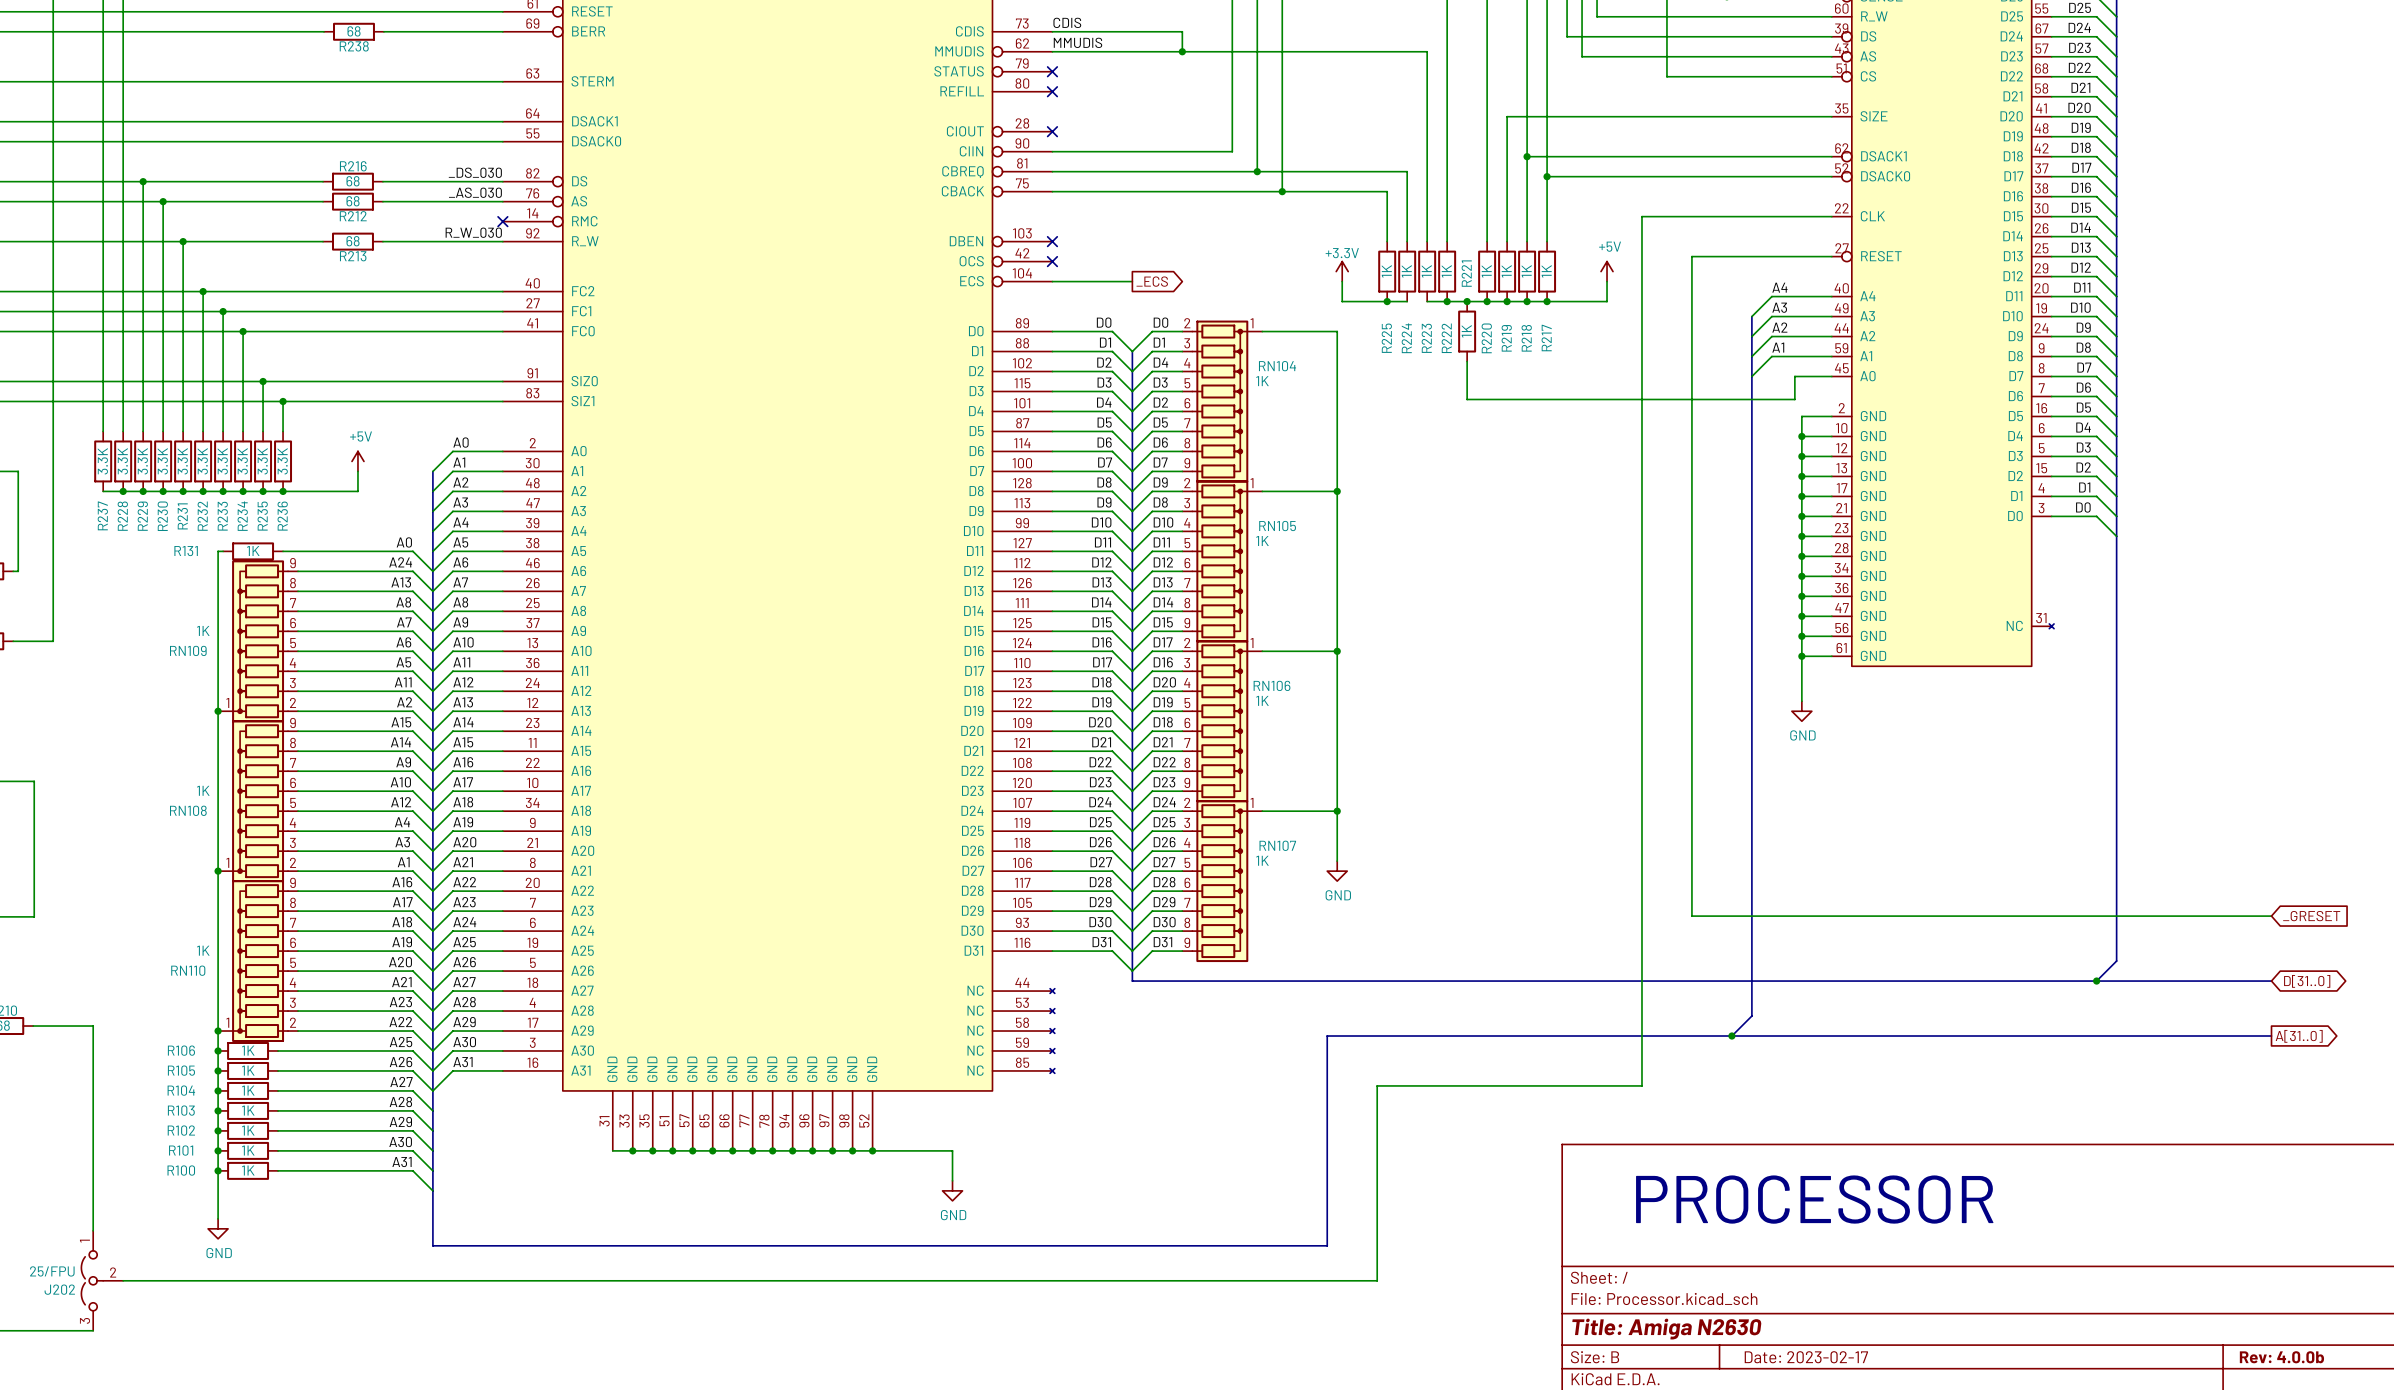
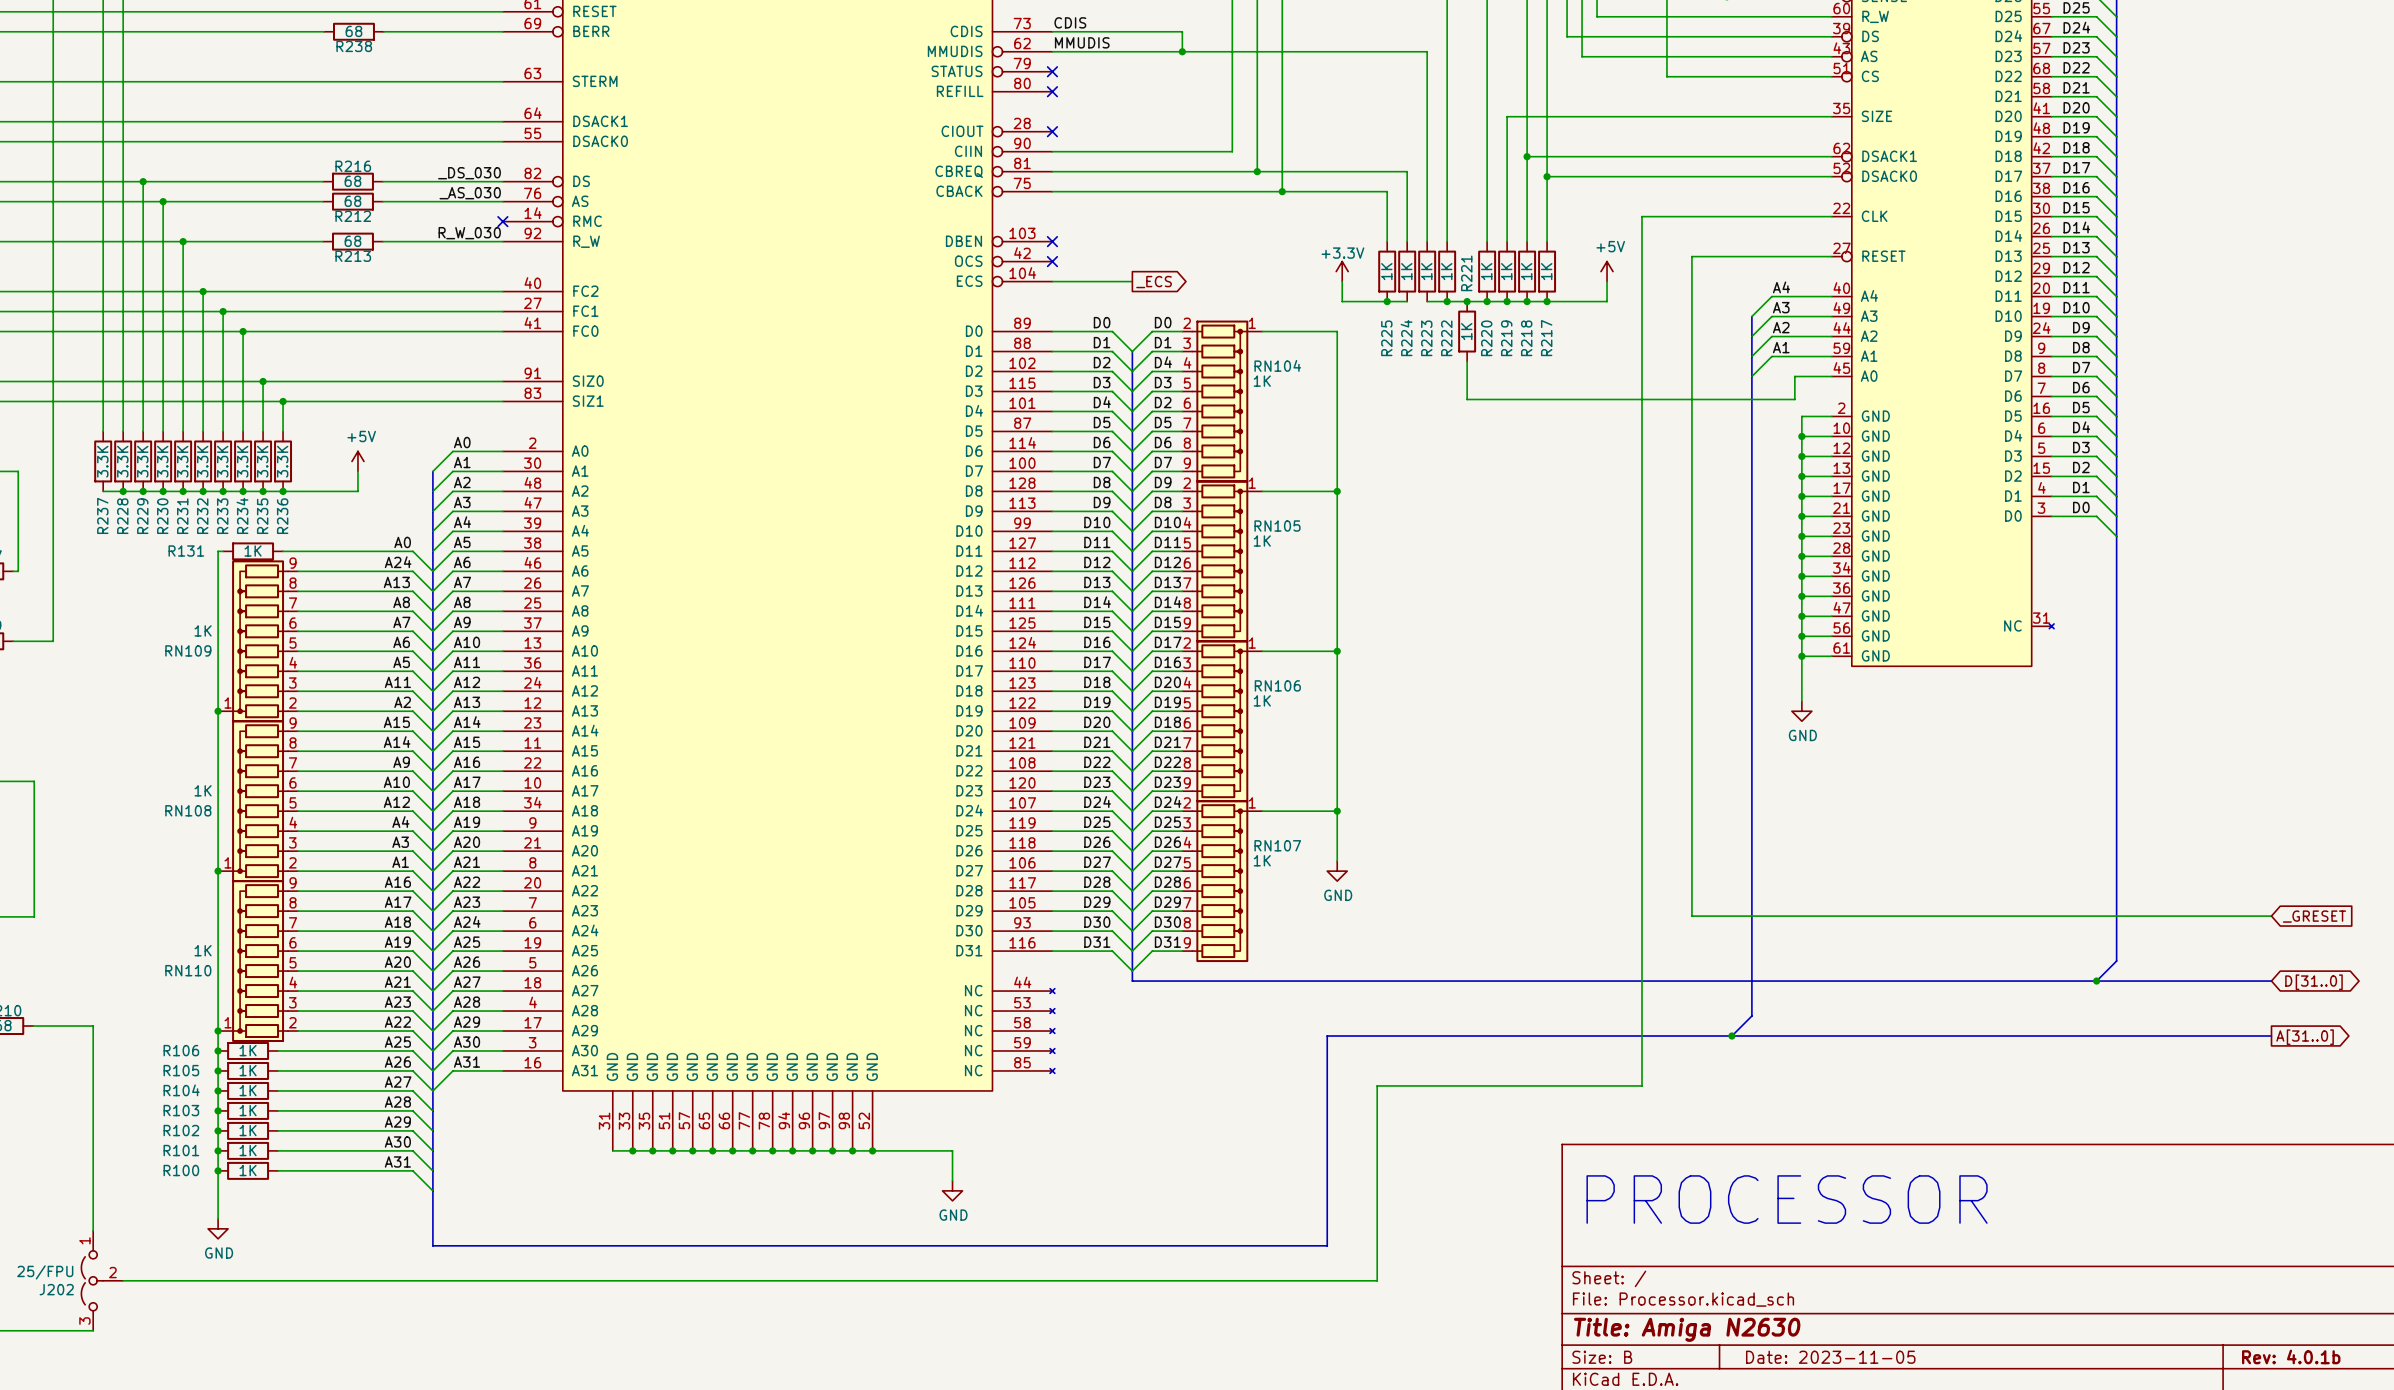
title block: Date: 2023-02-17 (1806, 1357) -> Date: 2023-11-05 (1830, 1357)
title block: Rev: 4.0.0b (2281, 1357) -> Rev: 4.0.1b (2291, 1356)

